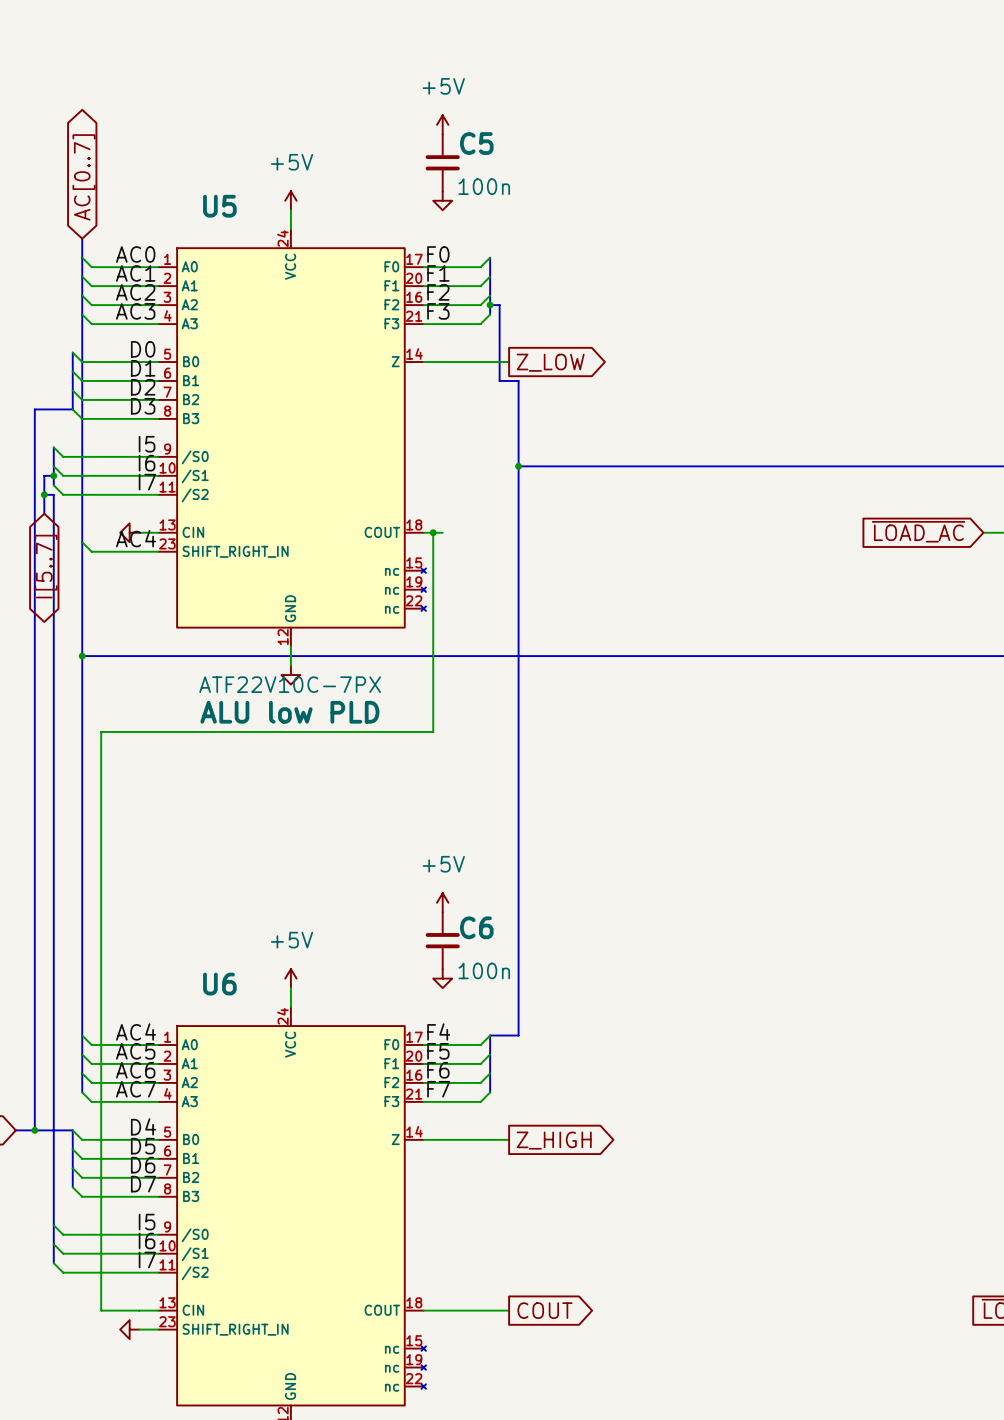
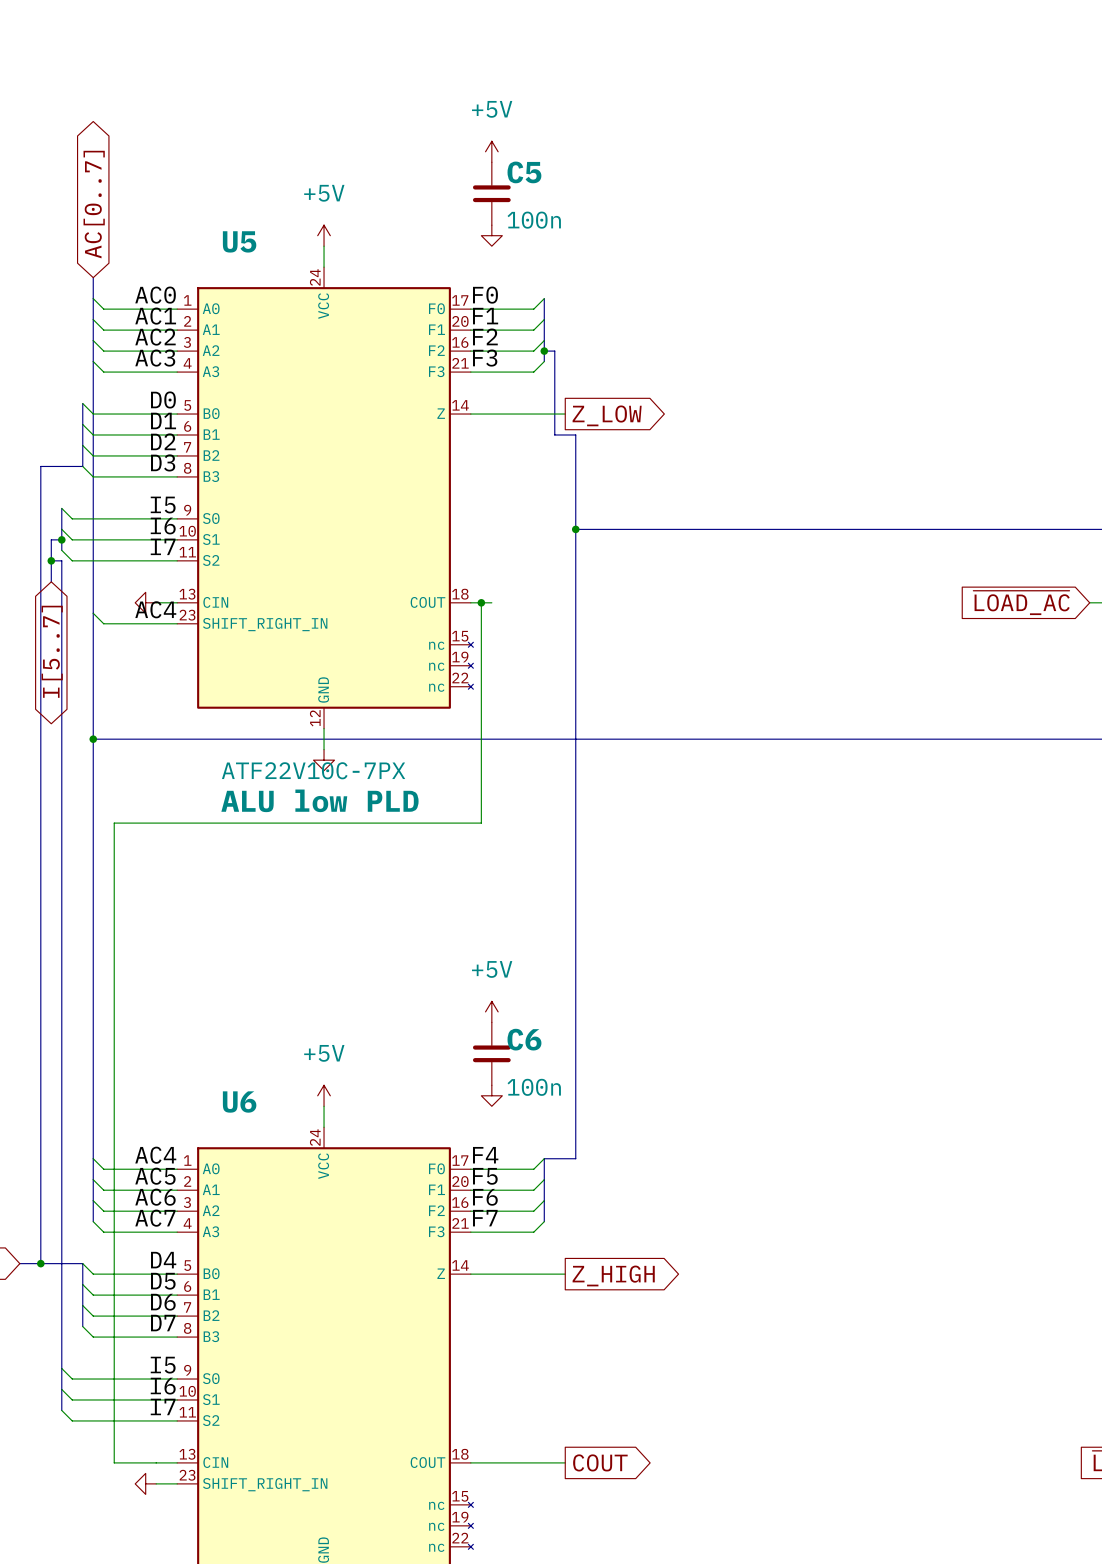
U5 pin name: /S0 (195, 457) -> S0 (211, 518)
U5 pin name: /S1 (195, 476) -> S1 (211, 539)
U5 pin name: /S2 (195, 495) -> S2 (211, 560)
U6 pin name: /S0 (195, 1235) -> S0 (211, 1378)
U6 pin name: /S1 (195, 1254) -> S1 (211, 1399)
U6 pin name: /S2 (195, 1273) -> S2 (211, 1420)

